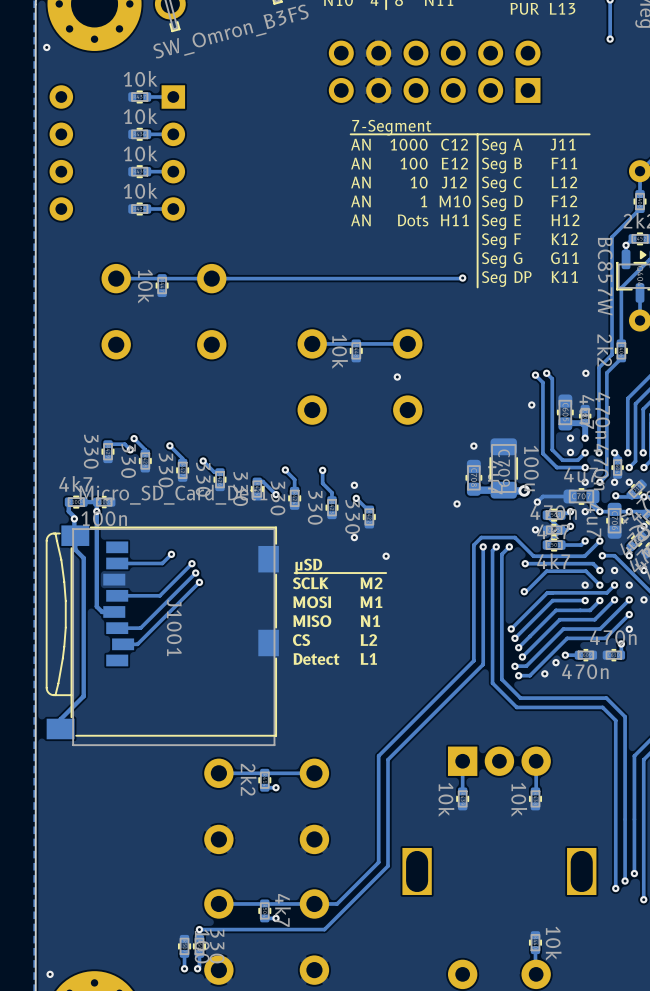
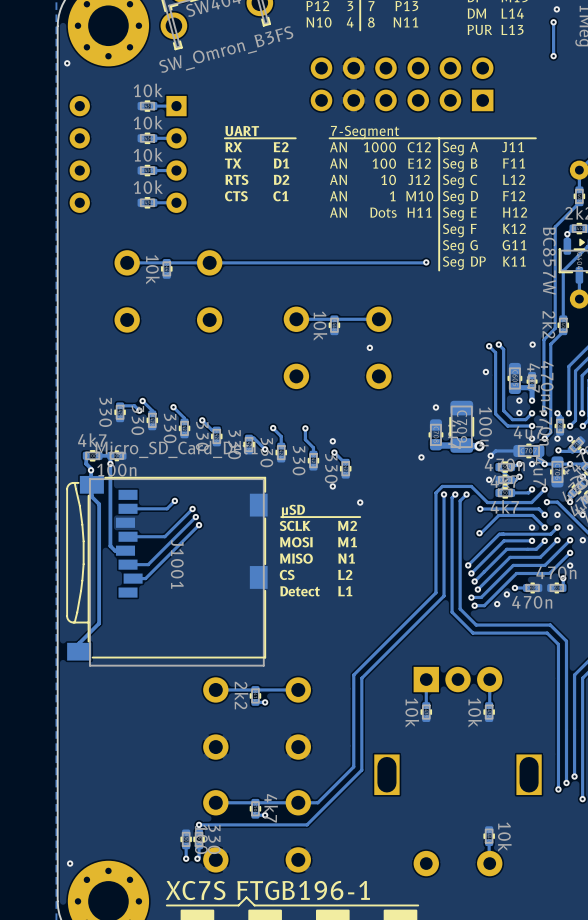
text: none -> UART (242, 131)
line: none -> (295, 138) (224, 138)
text: none -> RX (233, 147)
text: none -> E2 (281, 147)
text: none -> TX (233, 163)
text: none -> D1 (281, 163)
text: none -> RTS (236, 179)
text: none -> D2 (281, 179)
text: none -> CTS (236, 196)
text: none -> C1 (280, 196)

